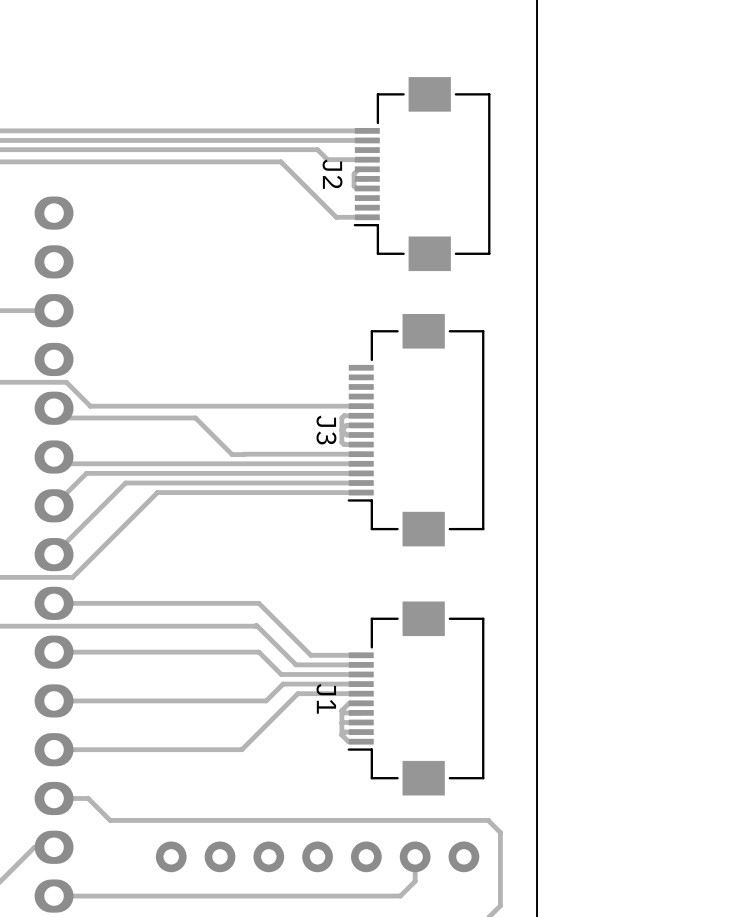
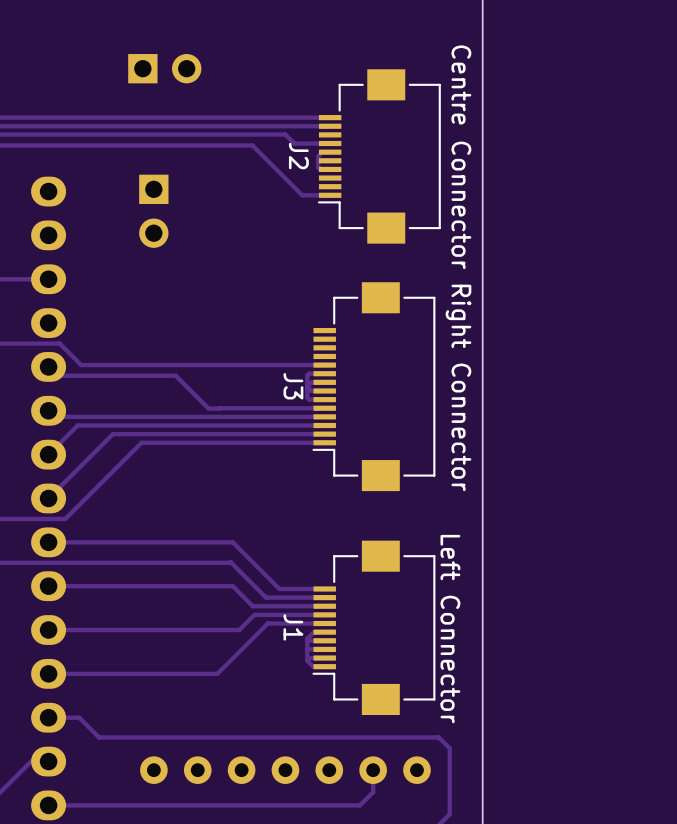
part: none -> (164, 68)
text: none -> Centre Connector (461, 157)
part: none -> (153, 211)
text: none -> Right Connector (458, 387)
text: none -> Left Connector (450, 629)

